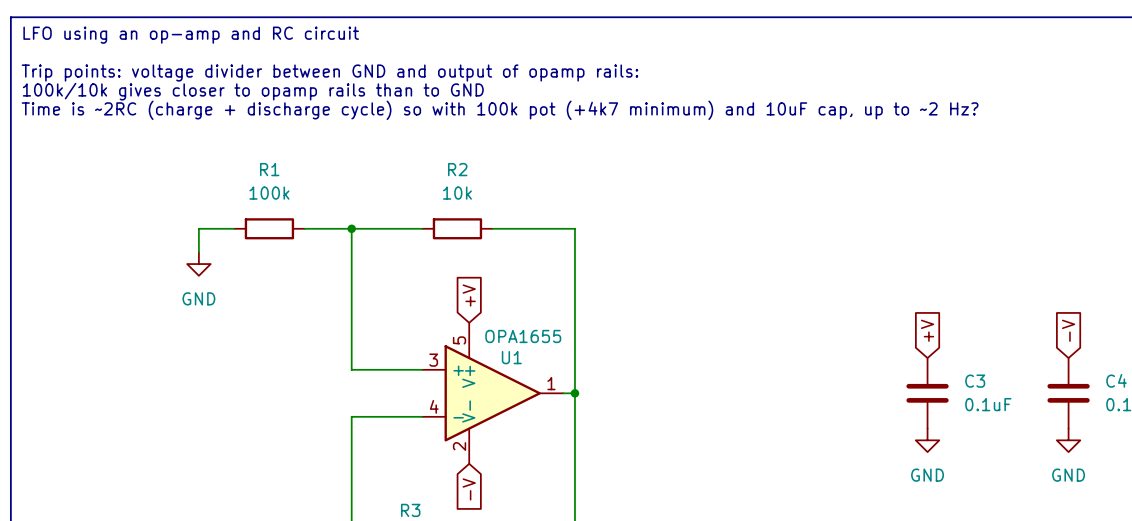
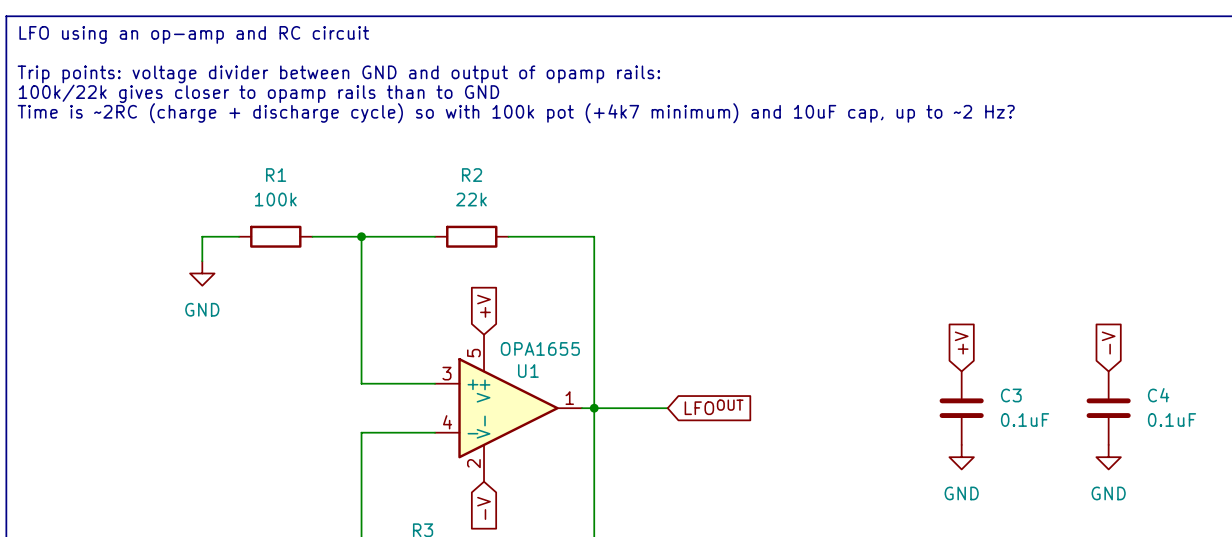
text: 100k/10k gives closer to opamp rails than to GND (253, 91) -> 100k/22k gives closer to opamp rails than to GND (258, 93)
R2 value: 10k (457, 193) -> 22k (471, 199)
global label: none -> LFOOUT (714, 407)
wire: none -> (594, 408) (667, 408)

